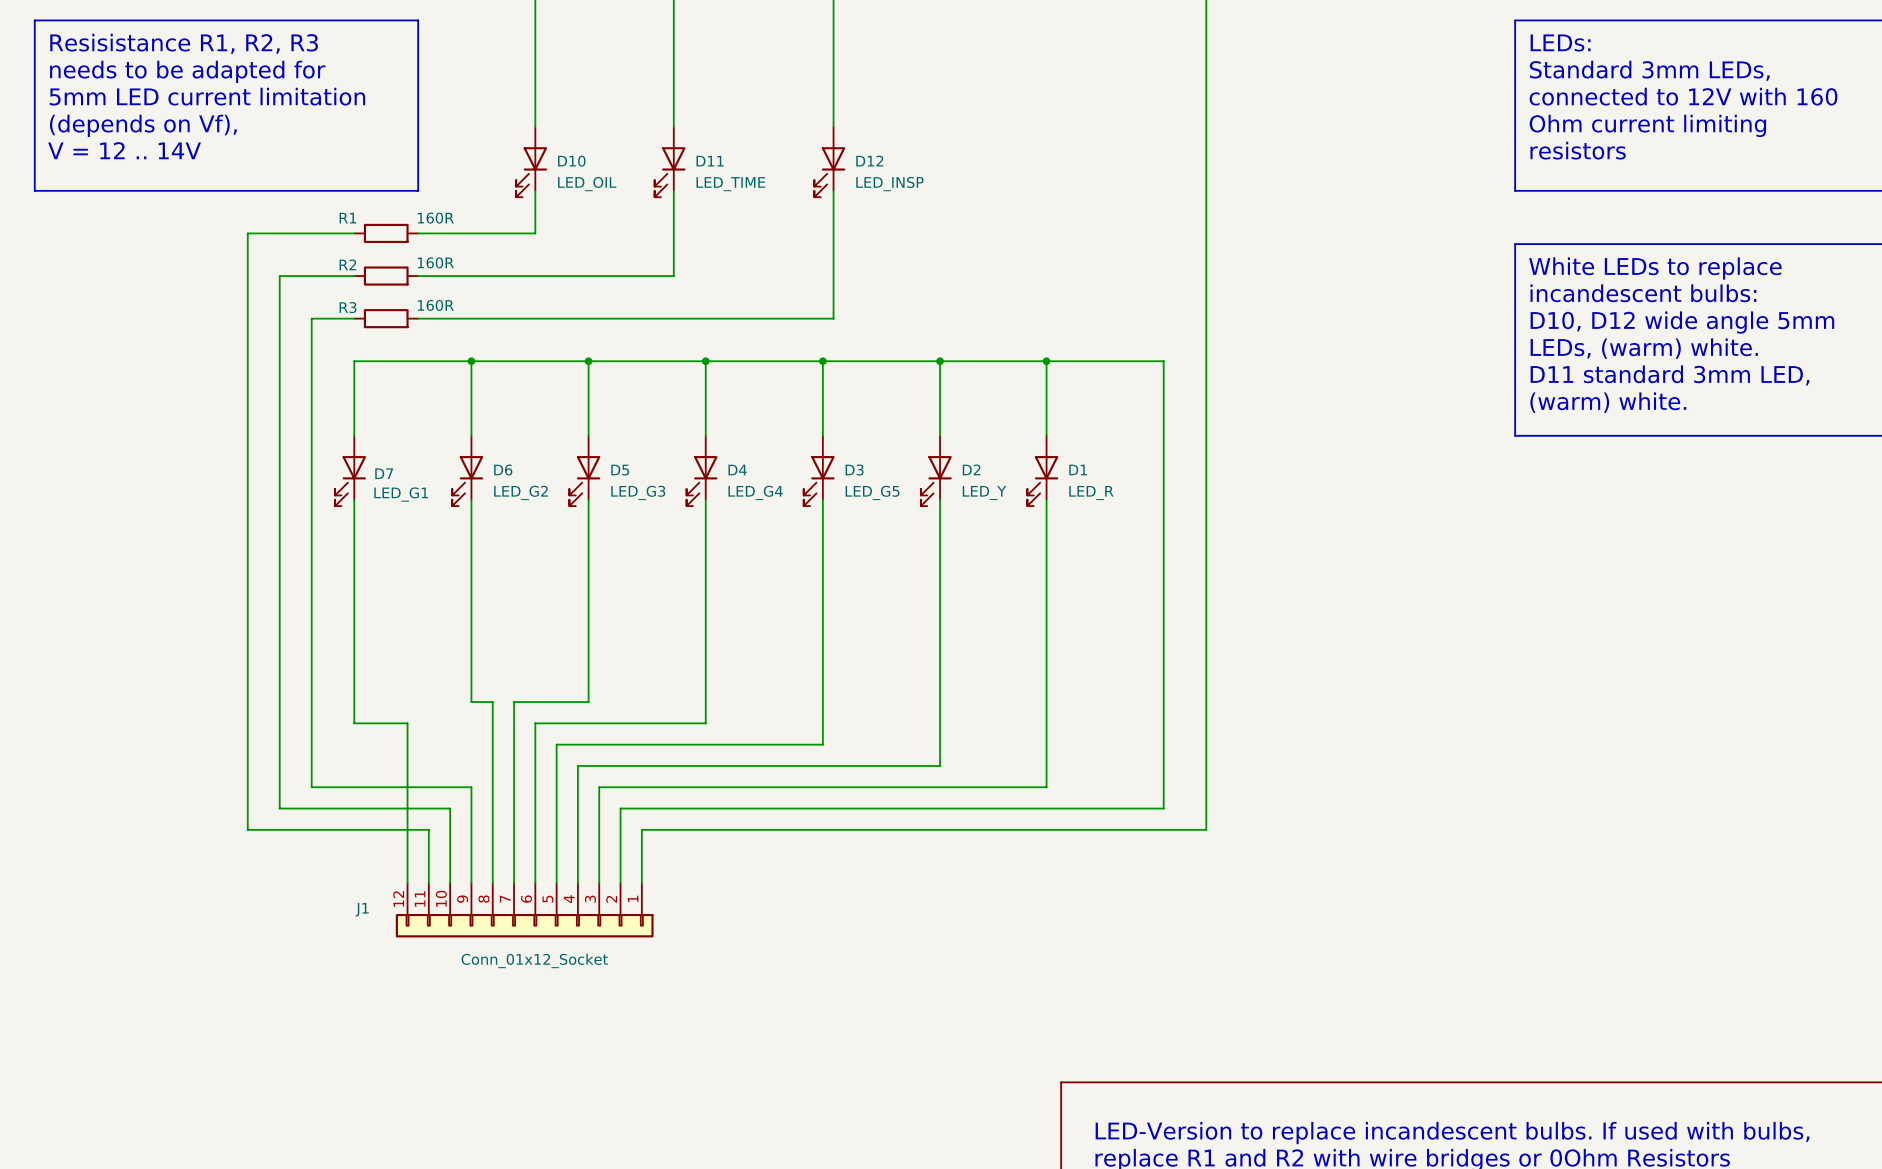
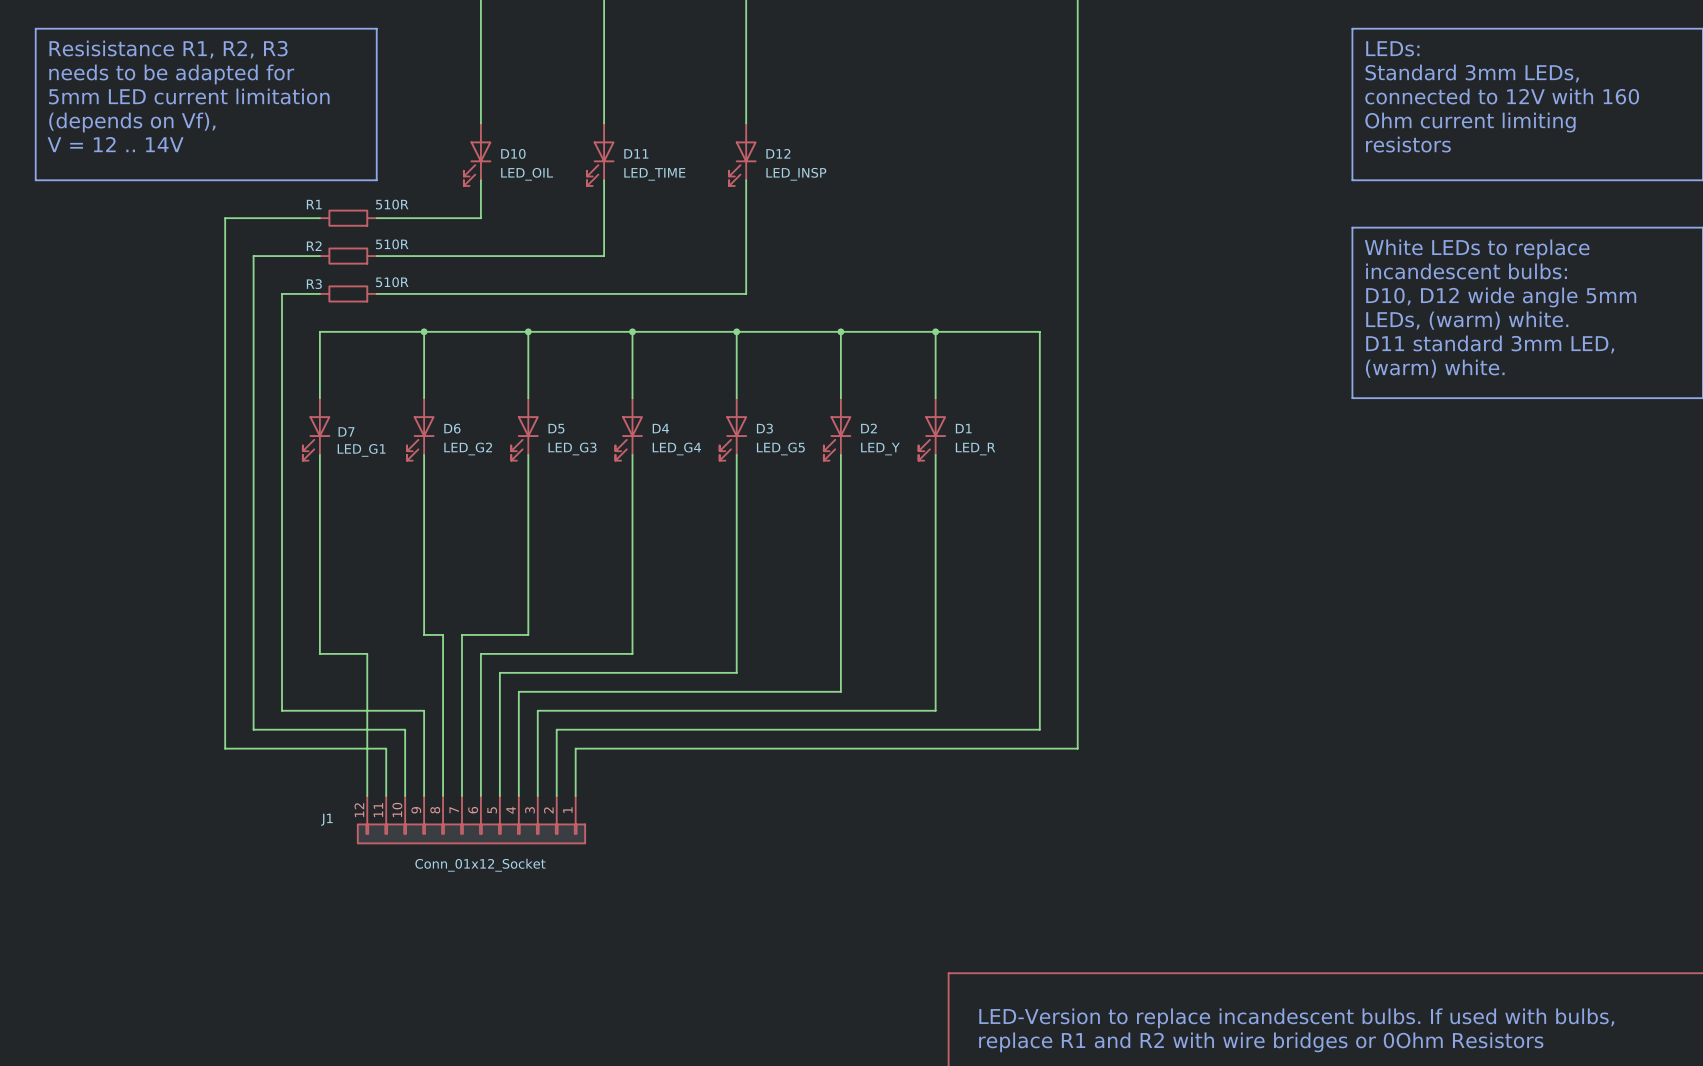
R1 value: 160R (435, 218) -> 510R (392, 204)
R2 value: 160R (435, 262) -> 510R (392, 244)
R3 value: 160R (435, 305) -> 510R (392, 282)

